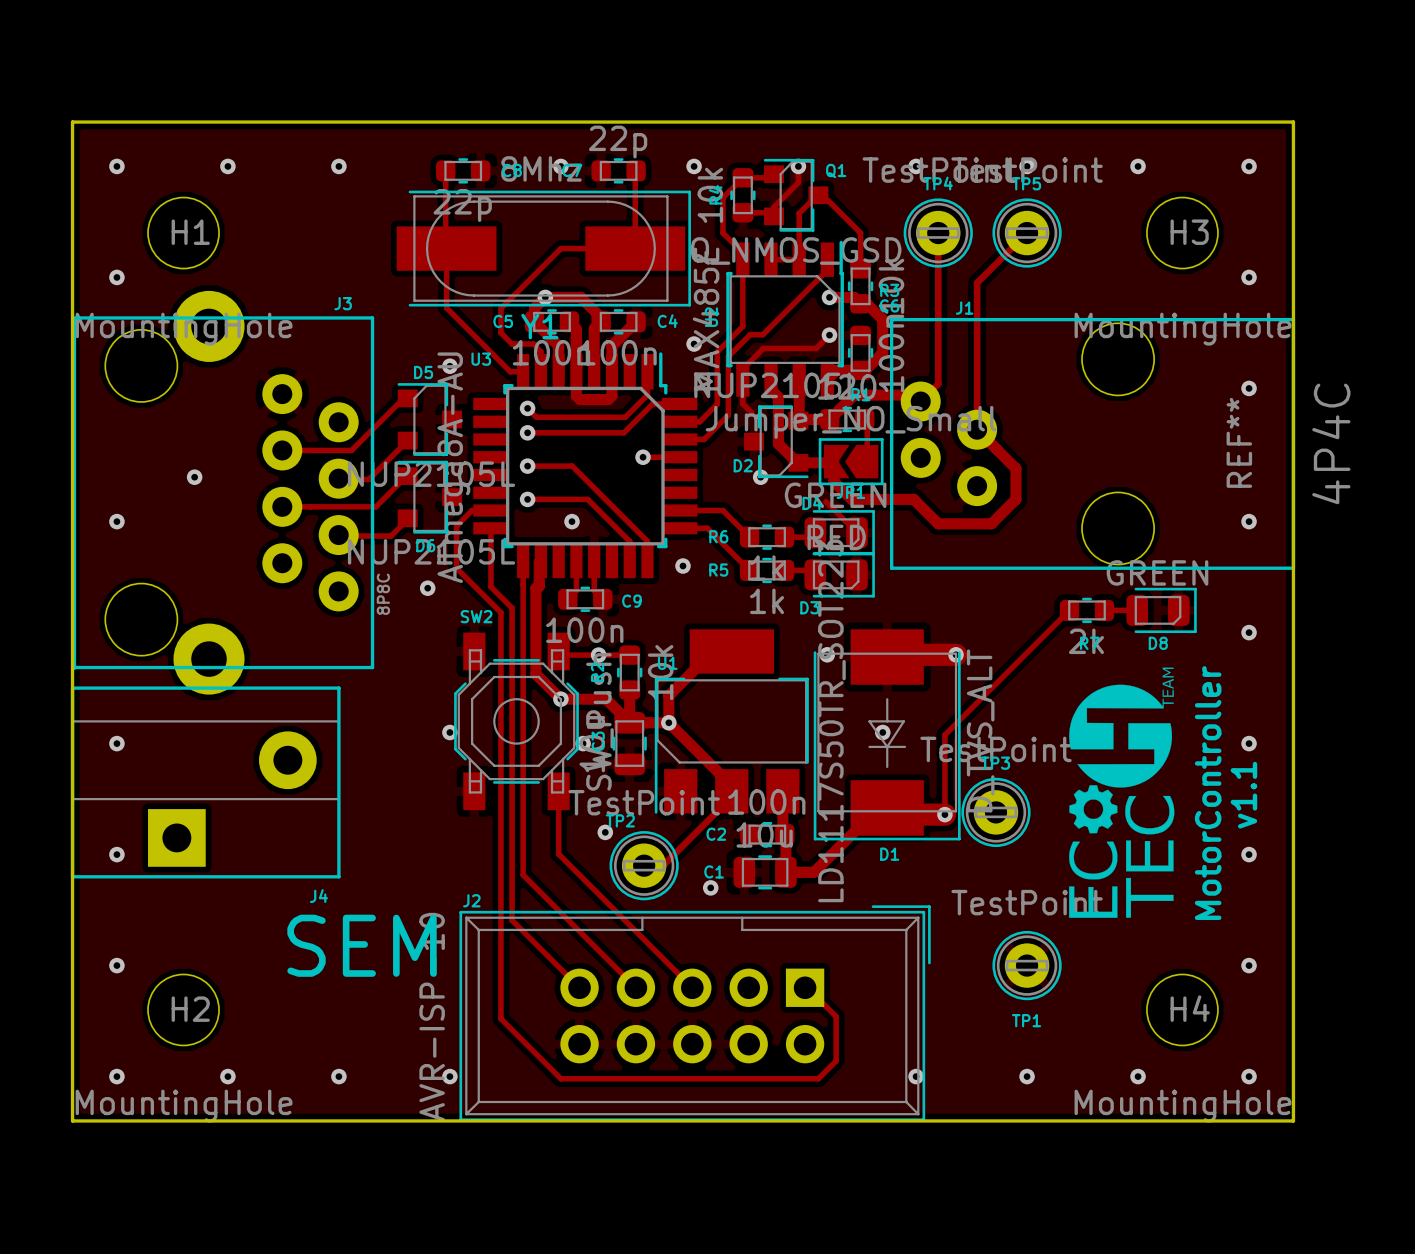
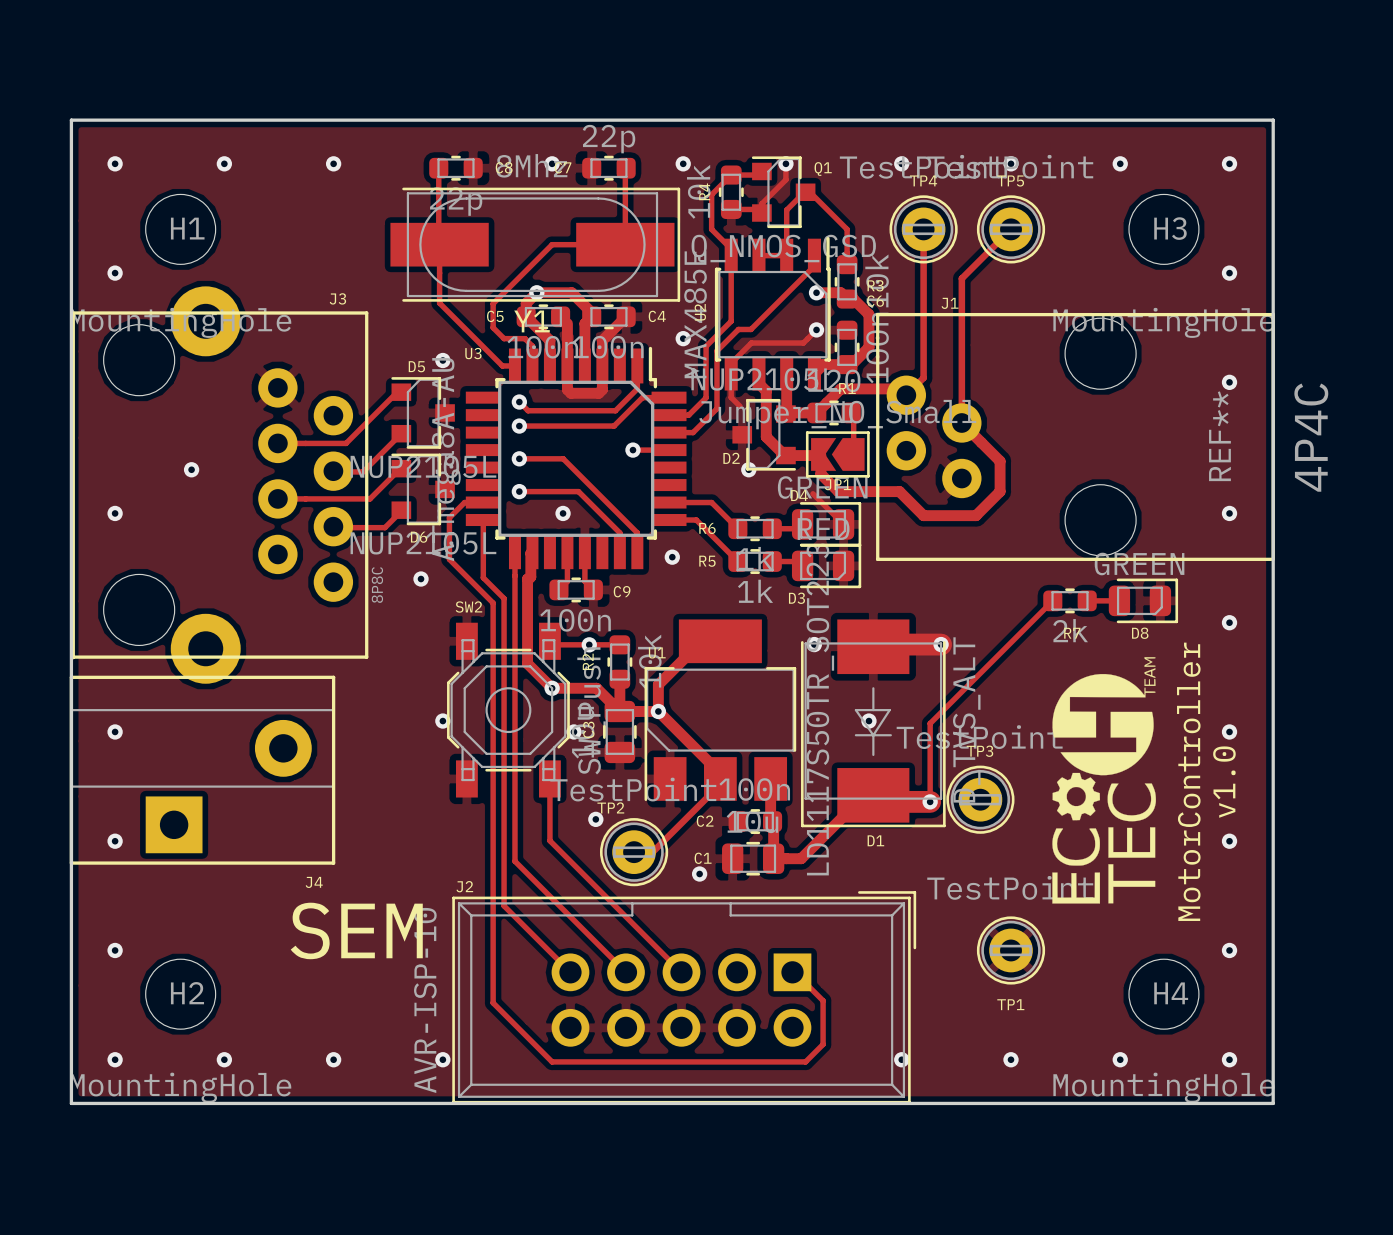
text: v1.1 (1243, 795) -> v1.0 (1224, 782)

